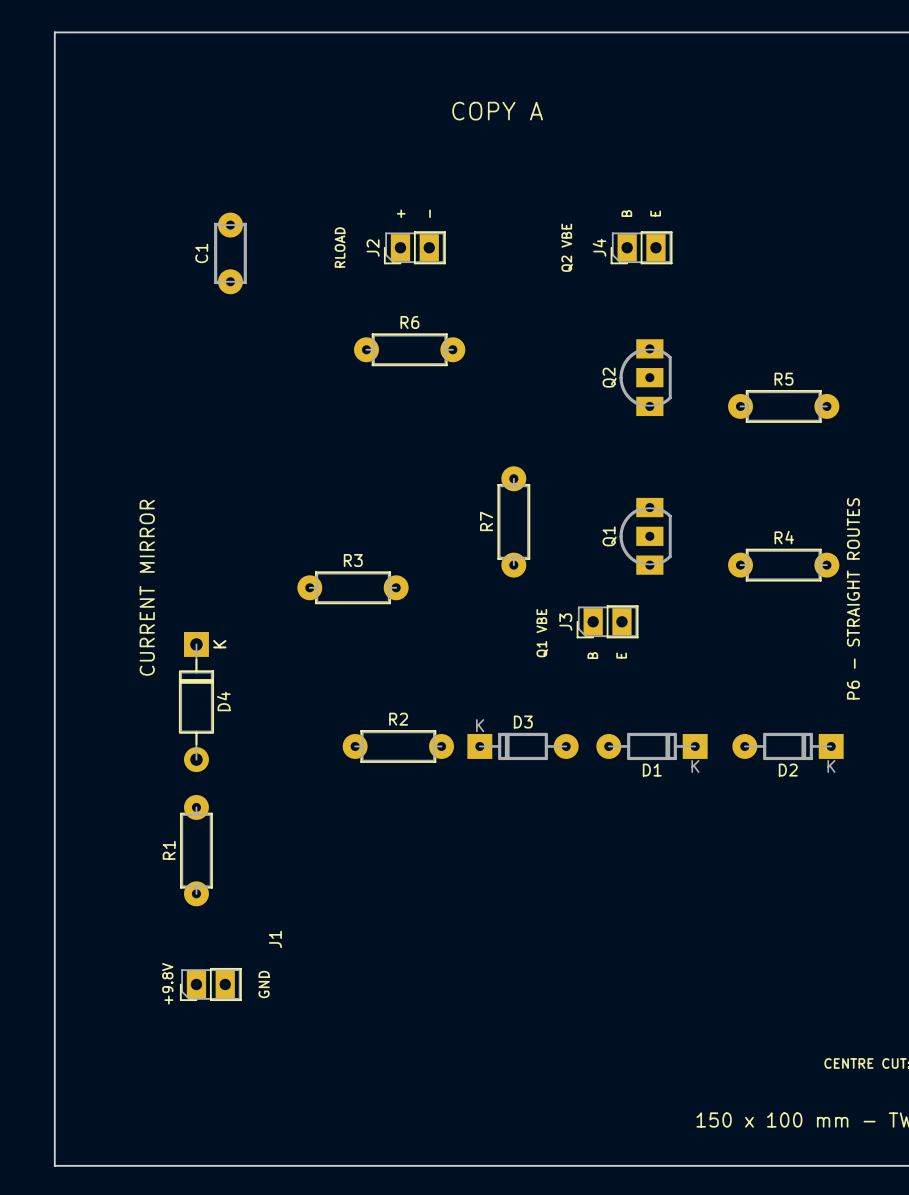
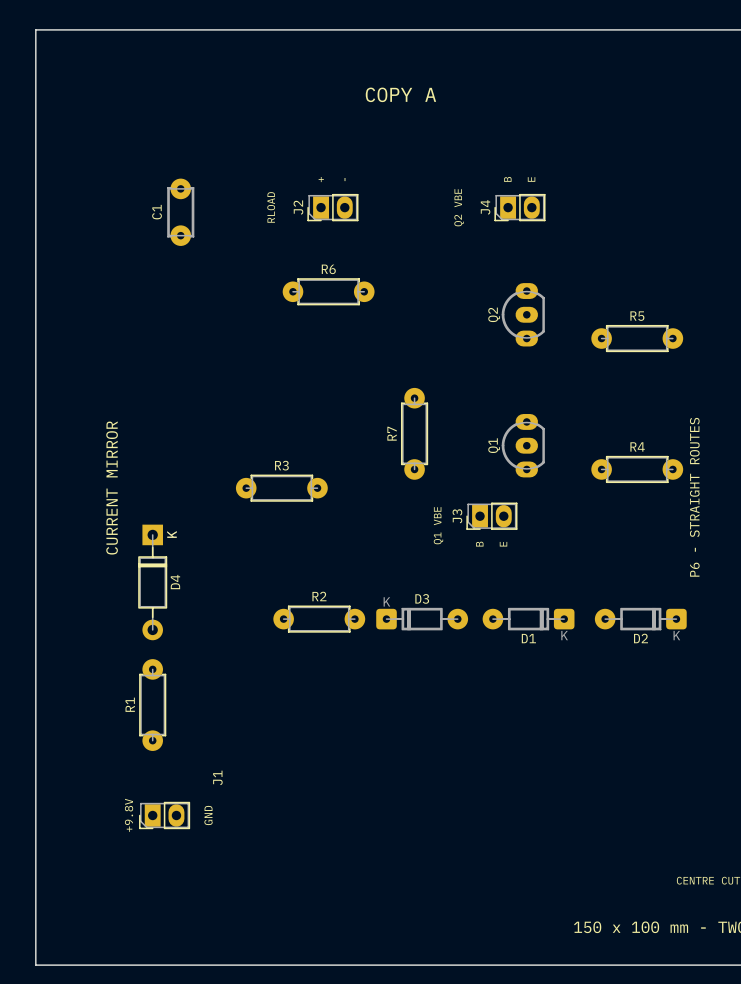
J2 footprint: [384, 231, 446, 265] -> [307, 194, 359, 222]
J4 footprint: [610, 231, 673, 265] -> [494, 194, 546, 222]
Q2 footprint: [619, 339, 672, 417] -> [501, 283, 545, 347]
Q1 footprint: [619, 497, 672, 575] -> [501, 414, 545, 478]
J3 footprint: [576, 605, 639, 639] -> [466, 502, 518, 530]
D3 footprint: [467, 733, 579, 760] -> [376, 608, 469, 631]
D1 footprint: [596, 733, 708, 760] -> [482, 608, 575, 631]
D2 footprint: [732, 733, 844, 760] -> [594, 608, 687, 631]
J1 footprint: [180, 968, 242, 1001] -> [139, 802, 190, 829]

